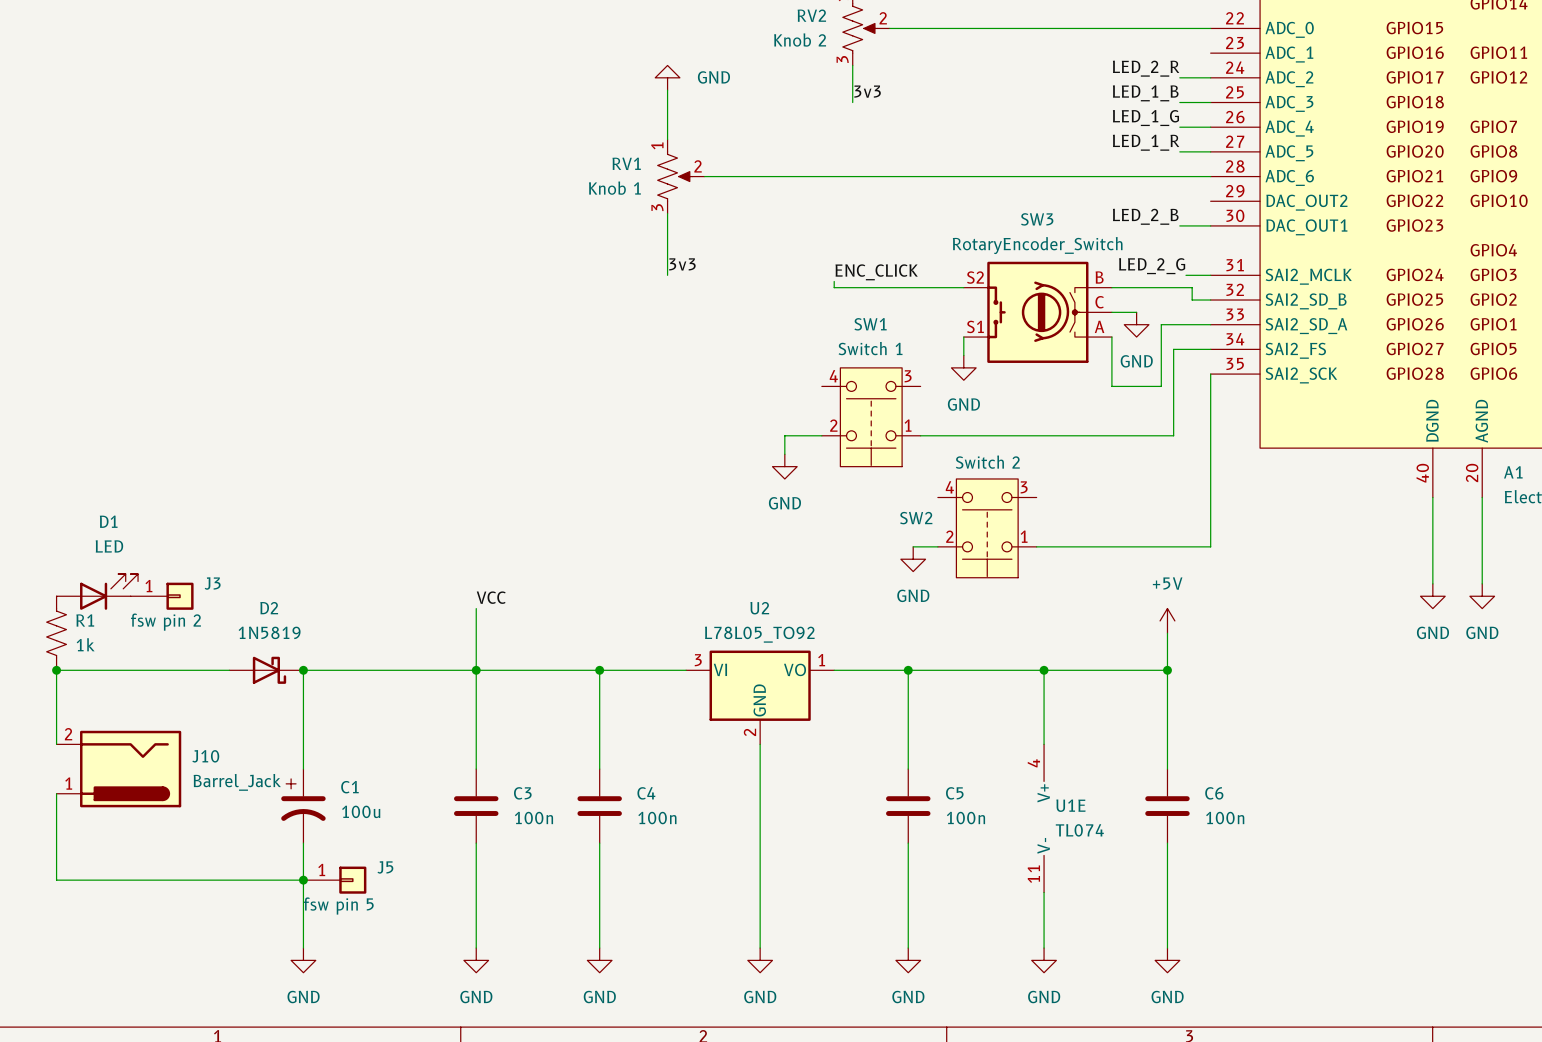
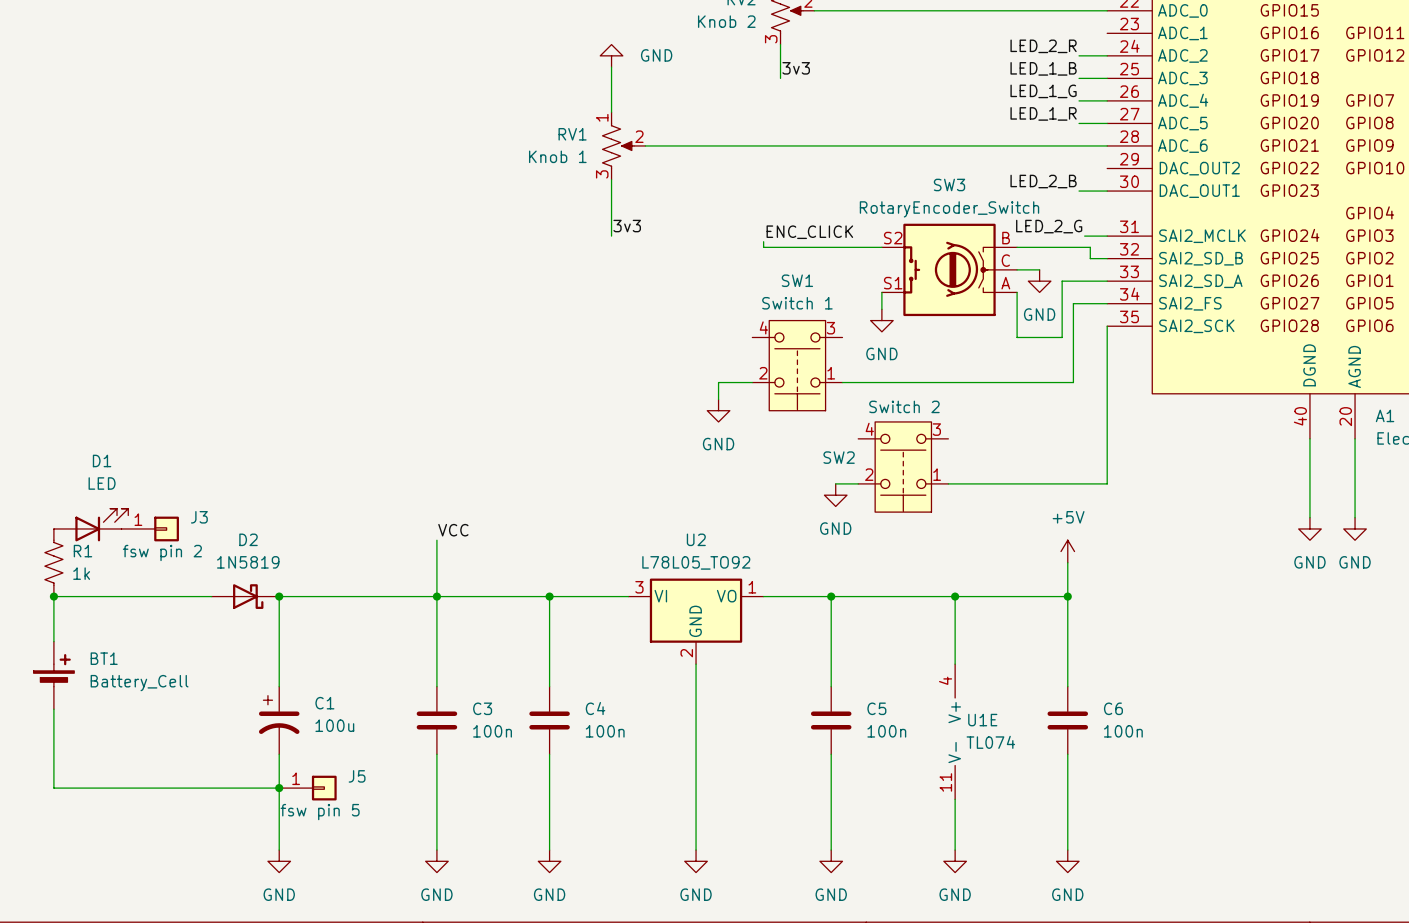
BT1: none -> Battery_Cell (53, 675)
J10: Barrel_Jack (118, 769) -> none

